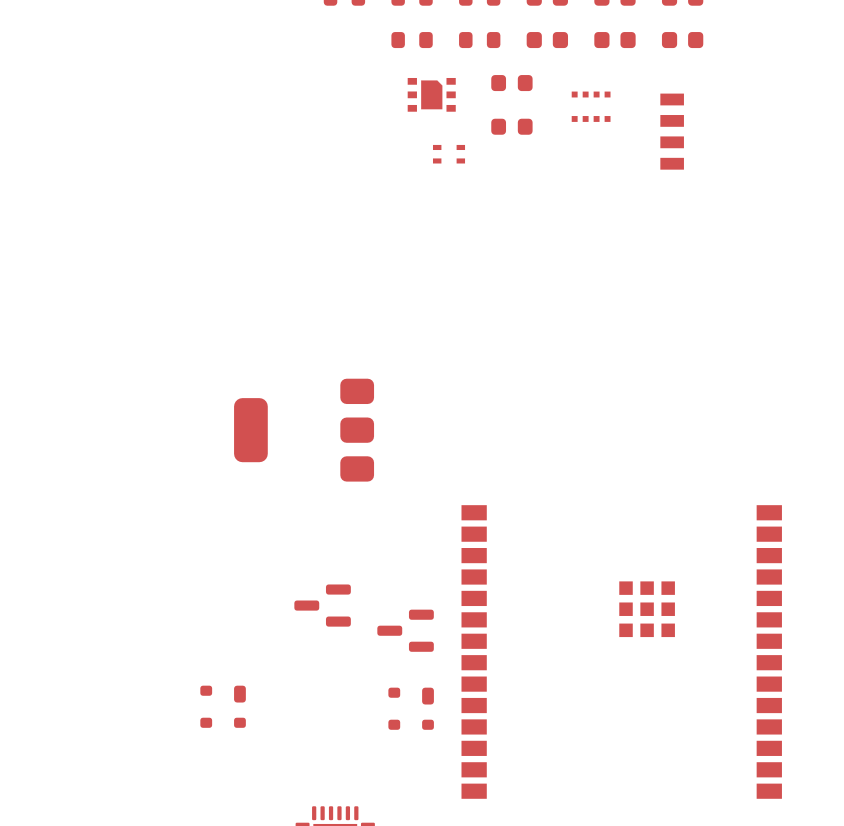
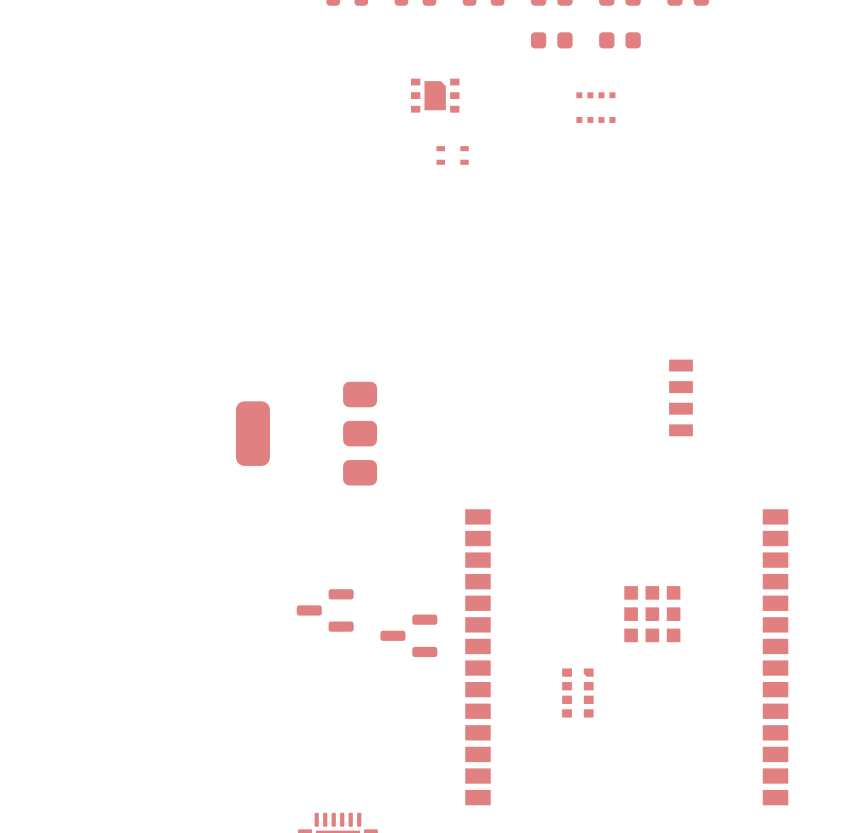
part: (412, 40) -> none
part: (479, 40) -> none
part: (682, 40) -> none
part: (511, 83) -> none
part: (511, 126) -> none
part position: (672, 131) -> (680, 397)
part: none -> (577, 693)
part: (223, 706) -> none
part: (411, 708) -> none

